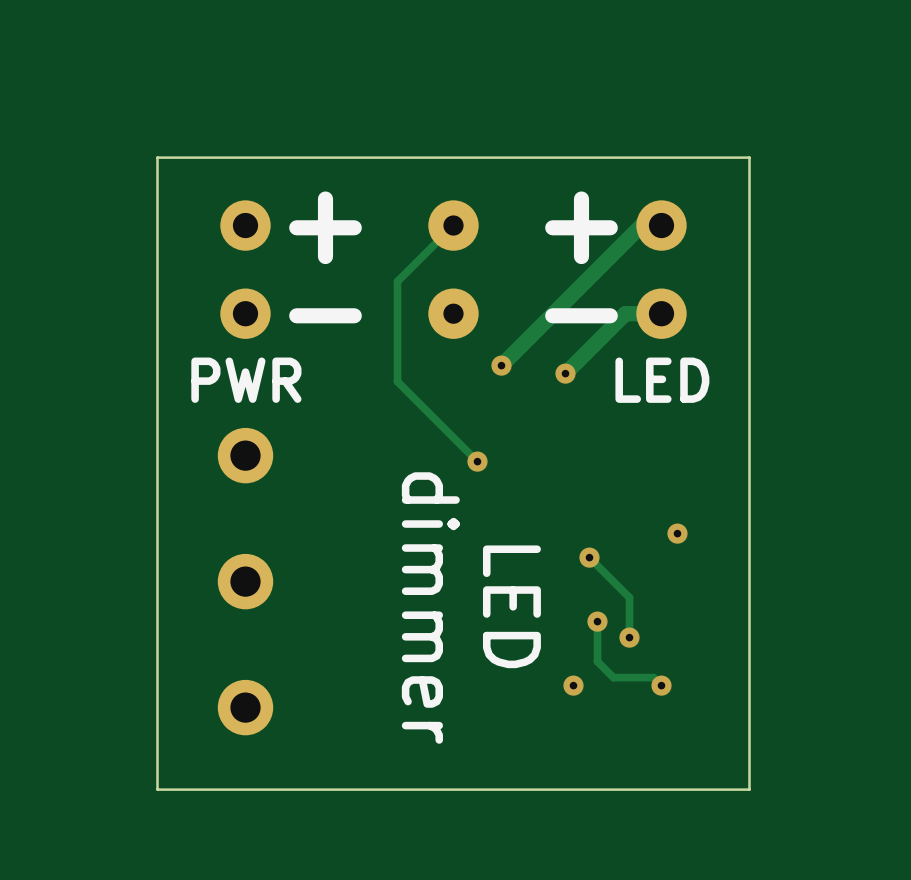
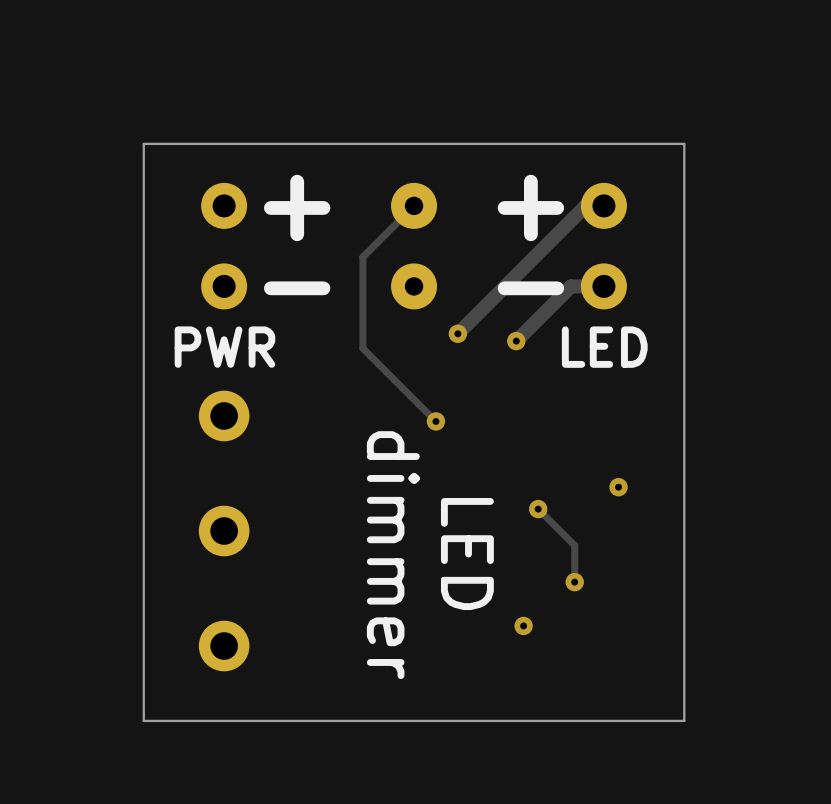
track: (597, 621) (597, 661) (613, 677) (653, 677) (661, 685) -> none
via: (597, 621) -> none
via: (661, 685) -> none

